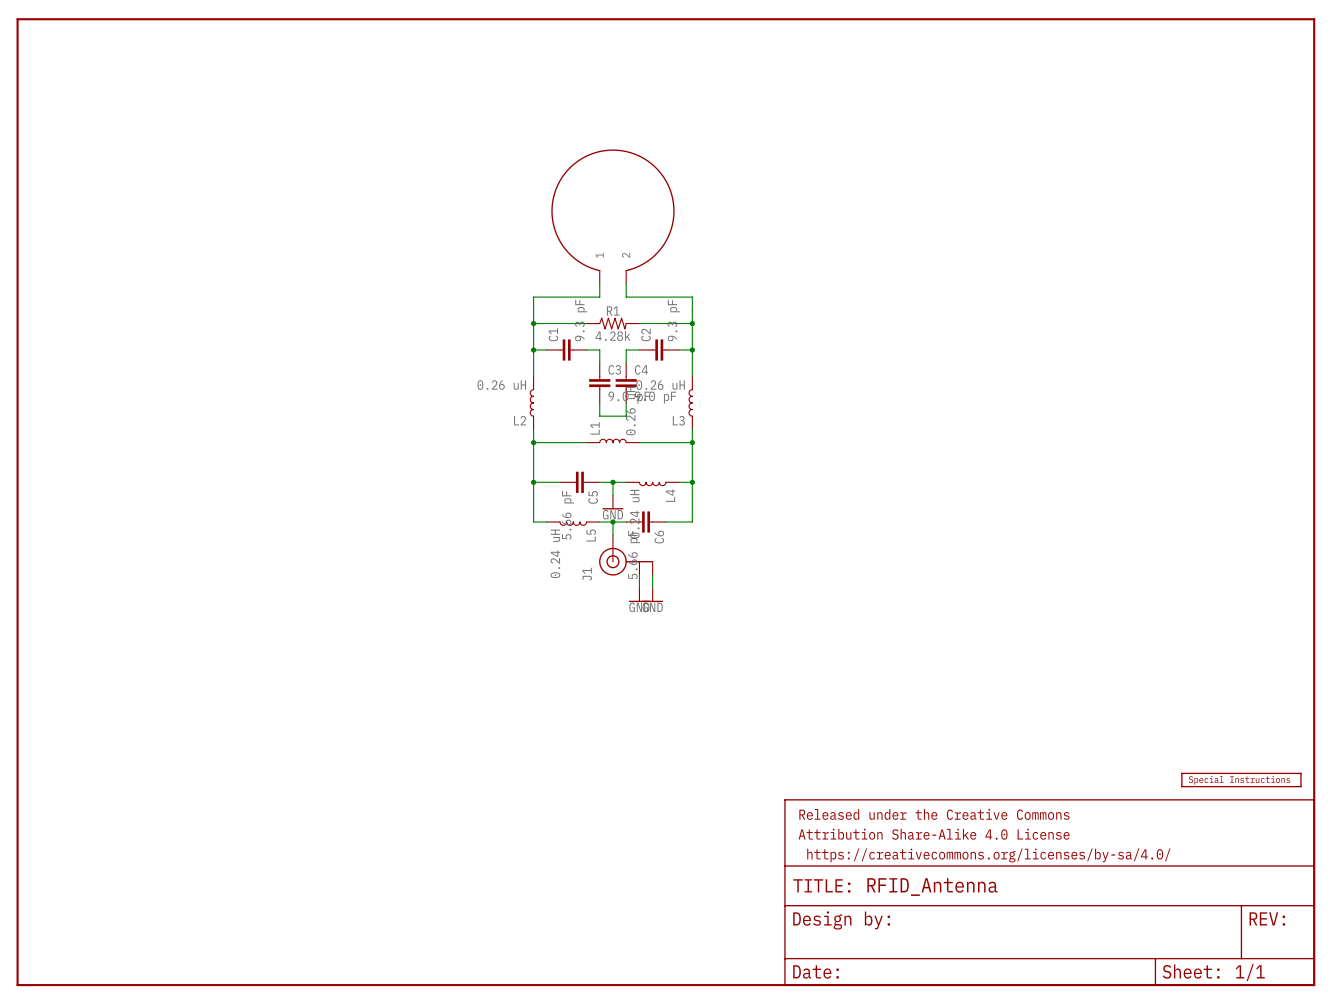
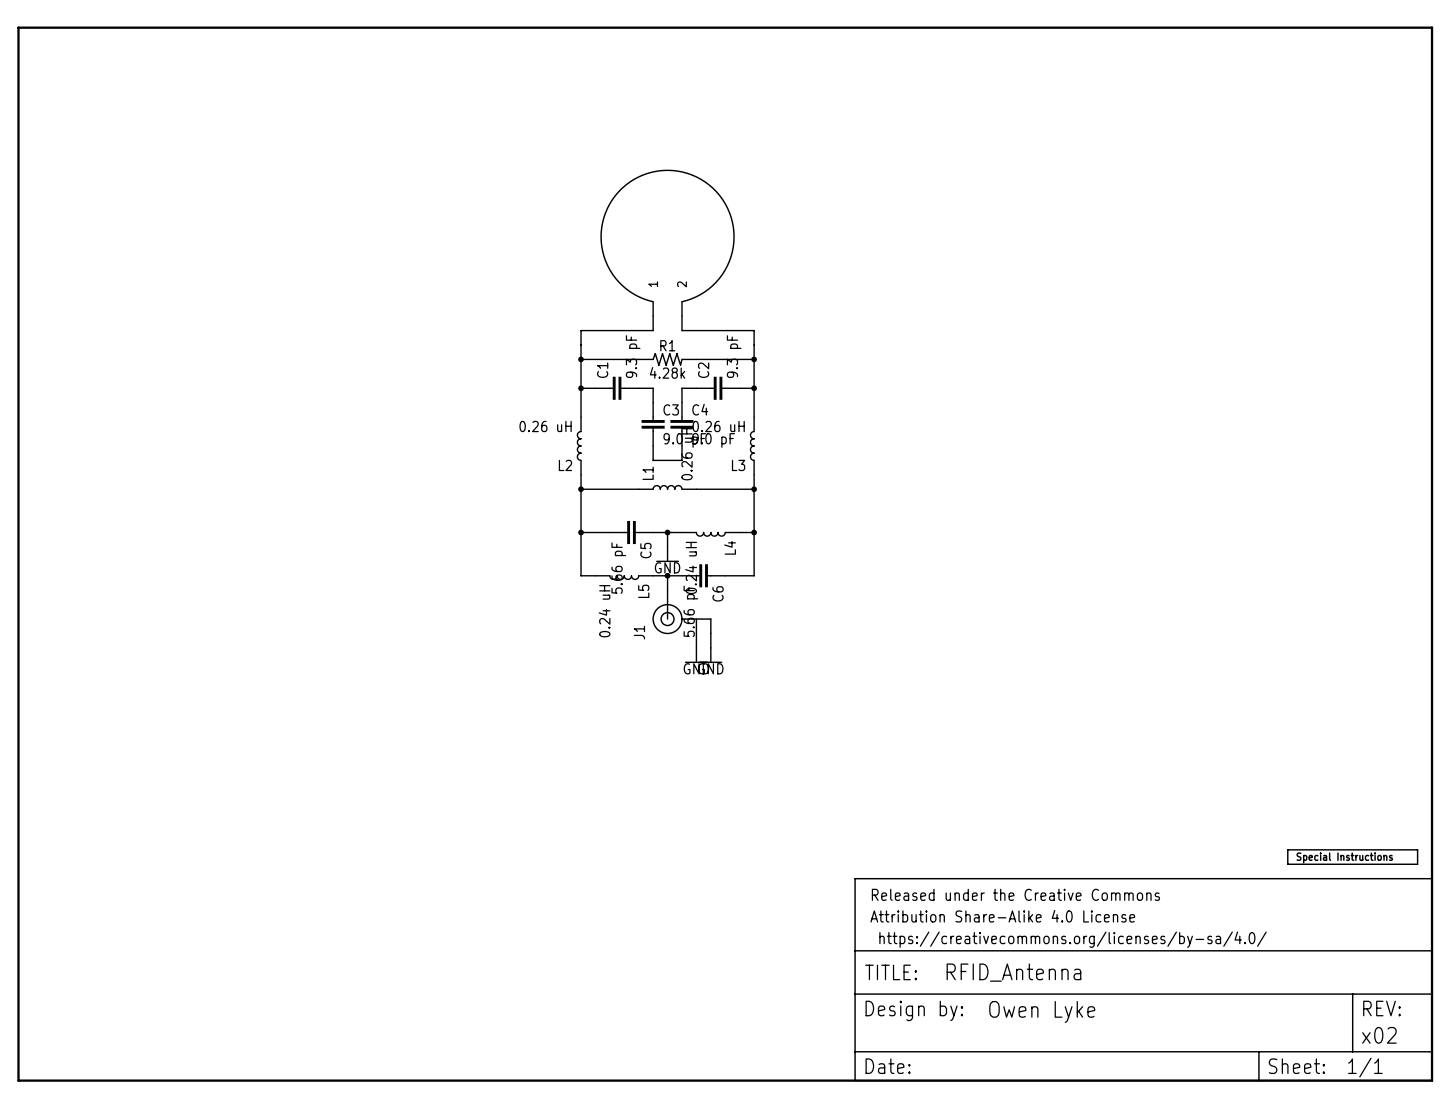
part text: none -> Owen Lyke (1042, 1011)
part text: none -> x02 (1379, 1035)

